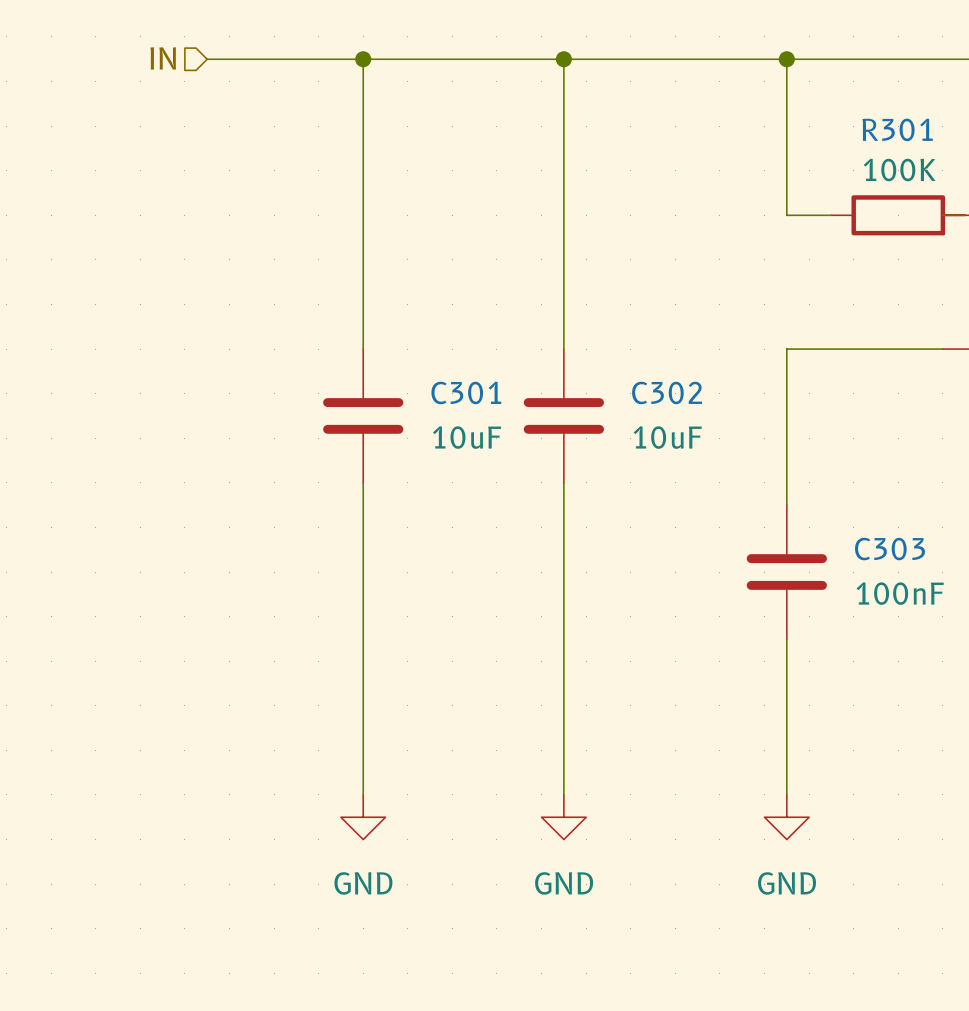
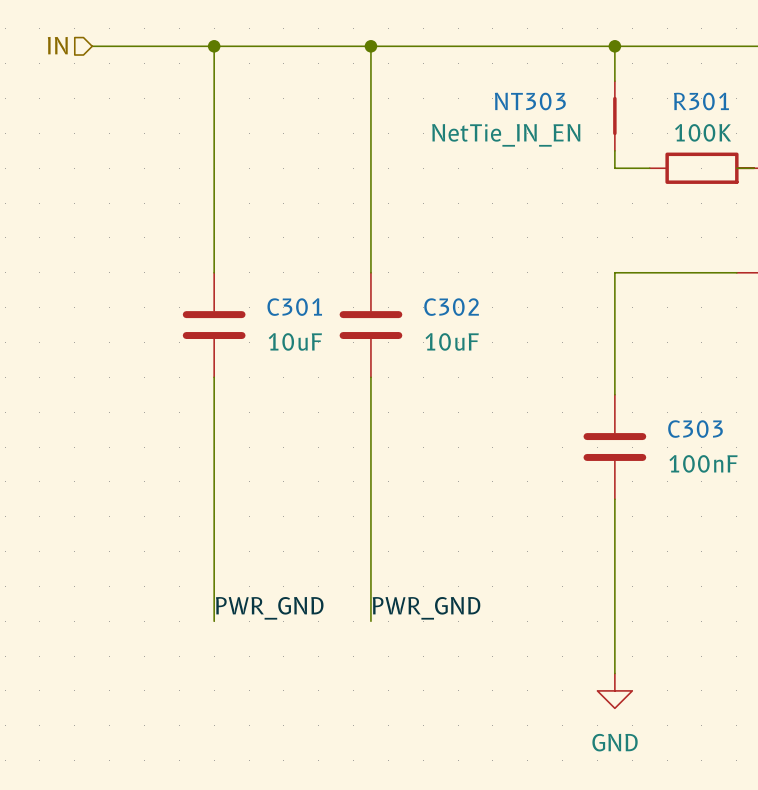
hierarchical label position: IN (163, 58) -> IN (57, 45)
wire: none -> (92, 46) (161, 46)
junction: none -> (214, 46)
wire: (363, 59) (363, 349) -> (214, 46) (214, 272)
junction: (363, 59) -> none
junction: none -> (370, 46)
wire: (563, 59) (563, 349) -> (370, 46) (370, 272)
junction: (563, 59) -> none
NT303: none -> NetTie_IN_EN (614, 115)
C301 position: (363, 415) -> (214, 325)
C302 position: (563, 415) -> (370, 325)
wire: (363, 482) (363, 794) -> (214, 377) (214, 621)
wire: (563, 482) (563, 794) -> (370, 377) (370, 621)
label: none -> PWR_GND (269, 608)
label: none -> PWR_GND (426, 608)
wire: none -> (614, 621) (614, 673)
power symbol: GND (363, 817) -> none
power symbol: GND (563, 817) -> none
power symbol position: GND (786, 817) -> GND (614, 690)

